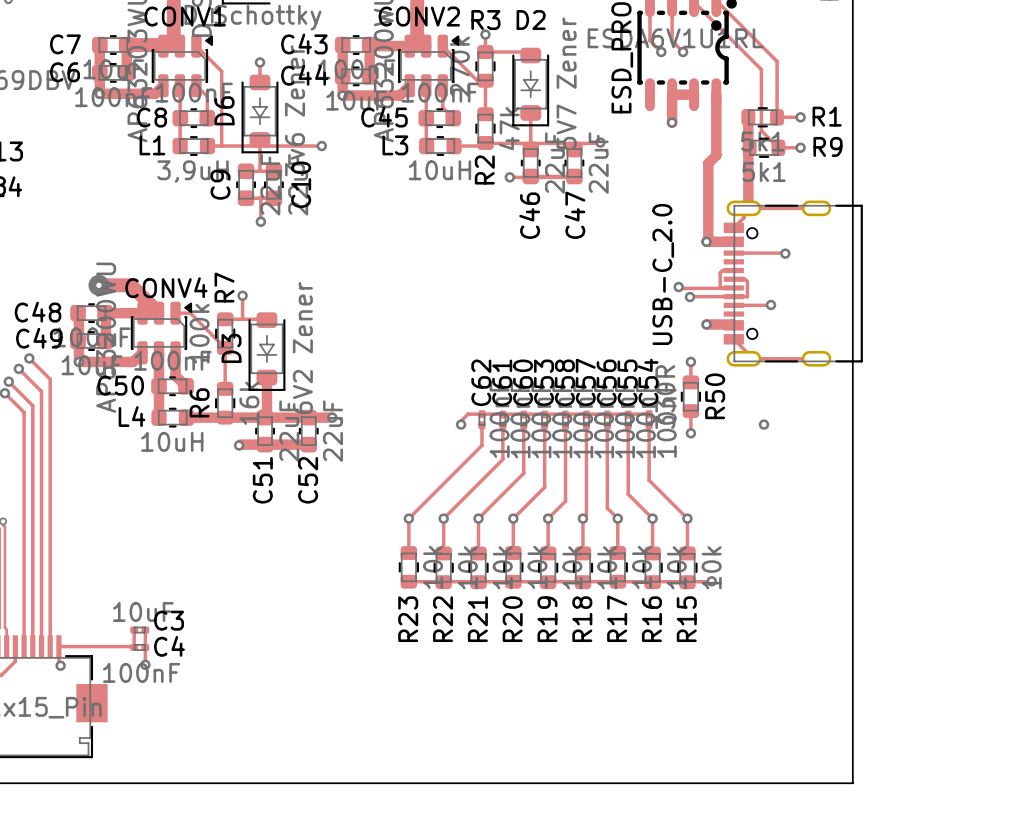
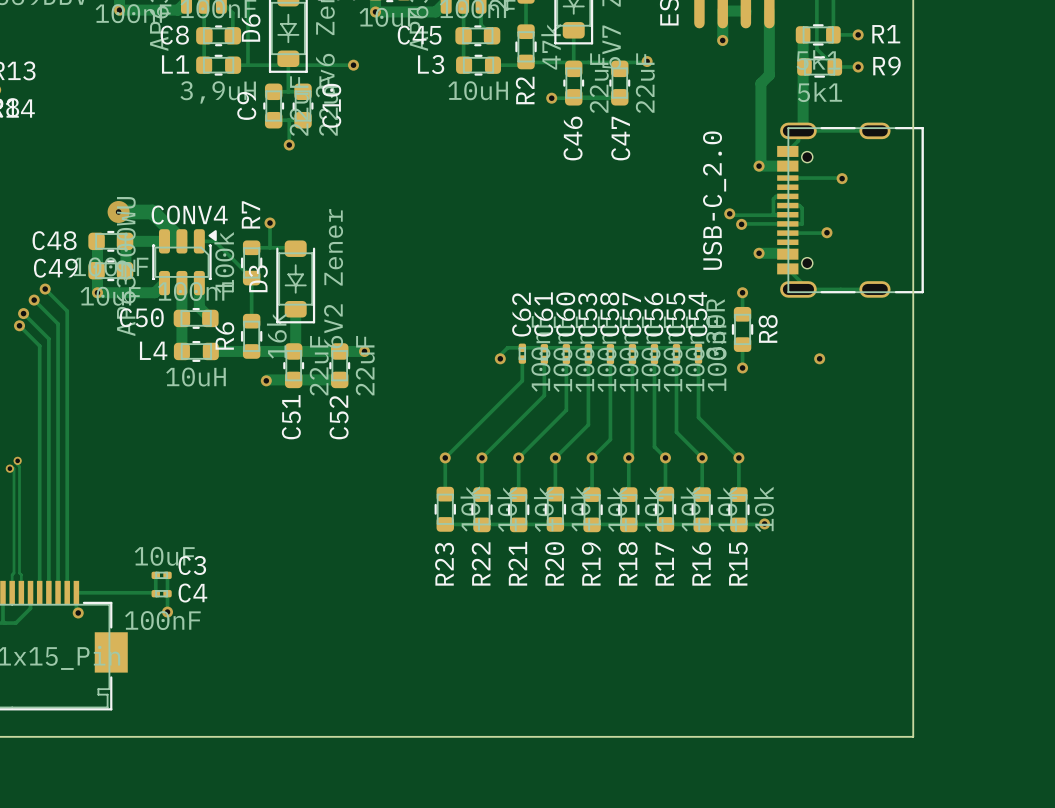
R50 name: R50 (715, 396) -> R8 (768, 328)

